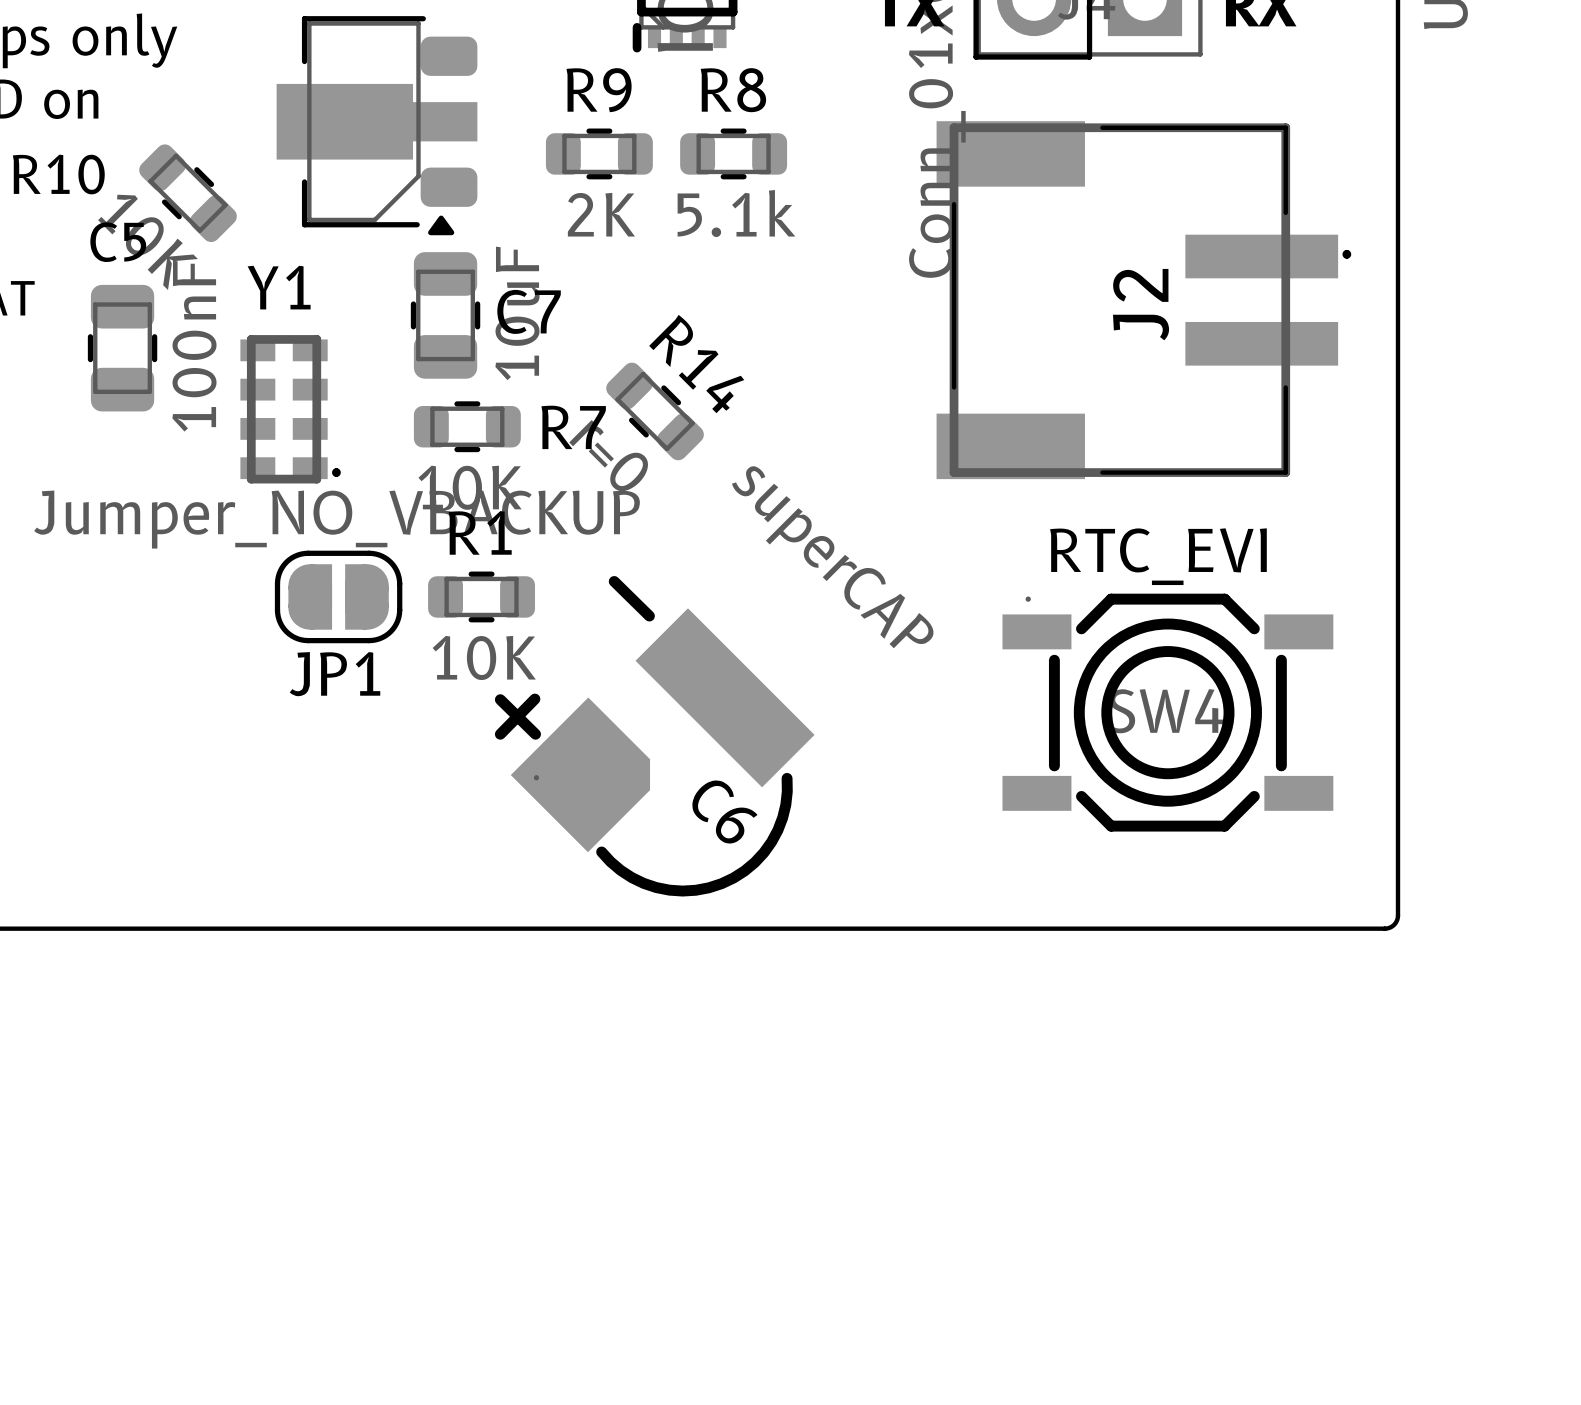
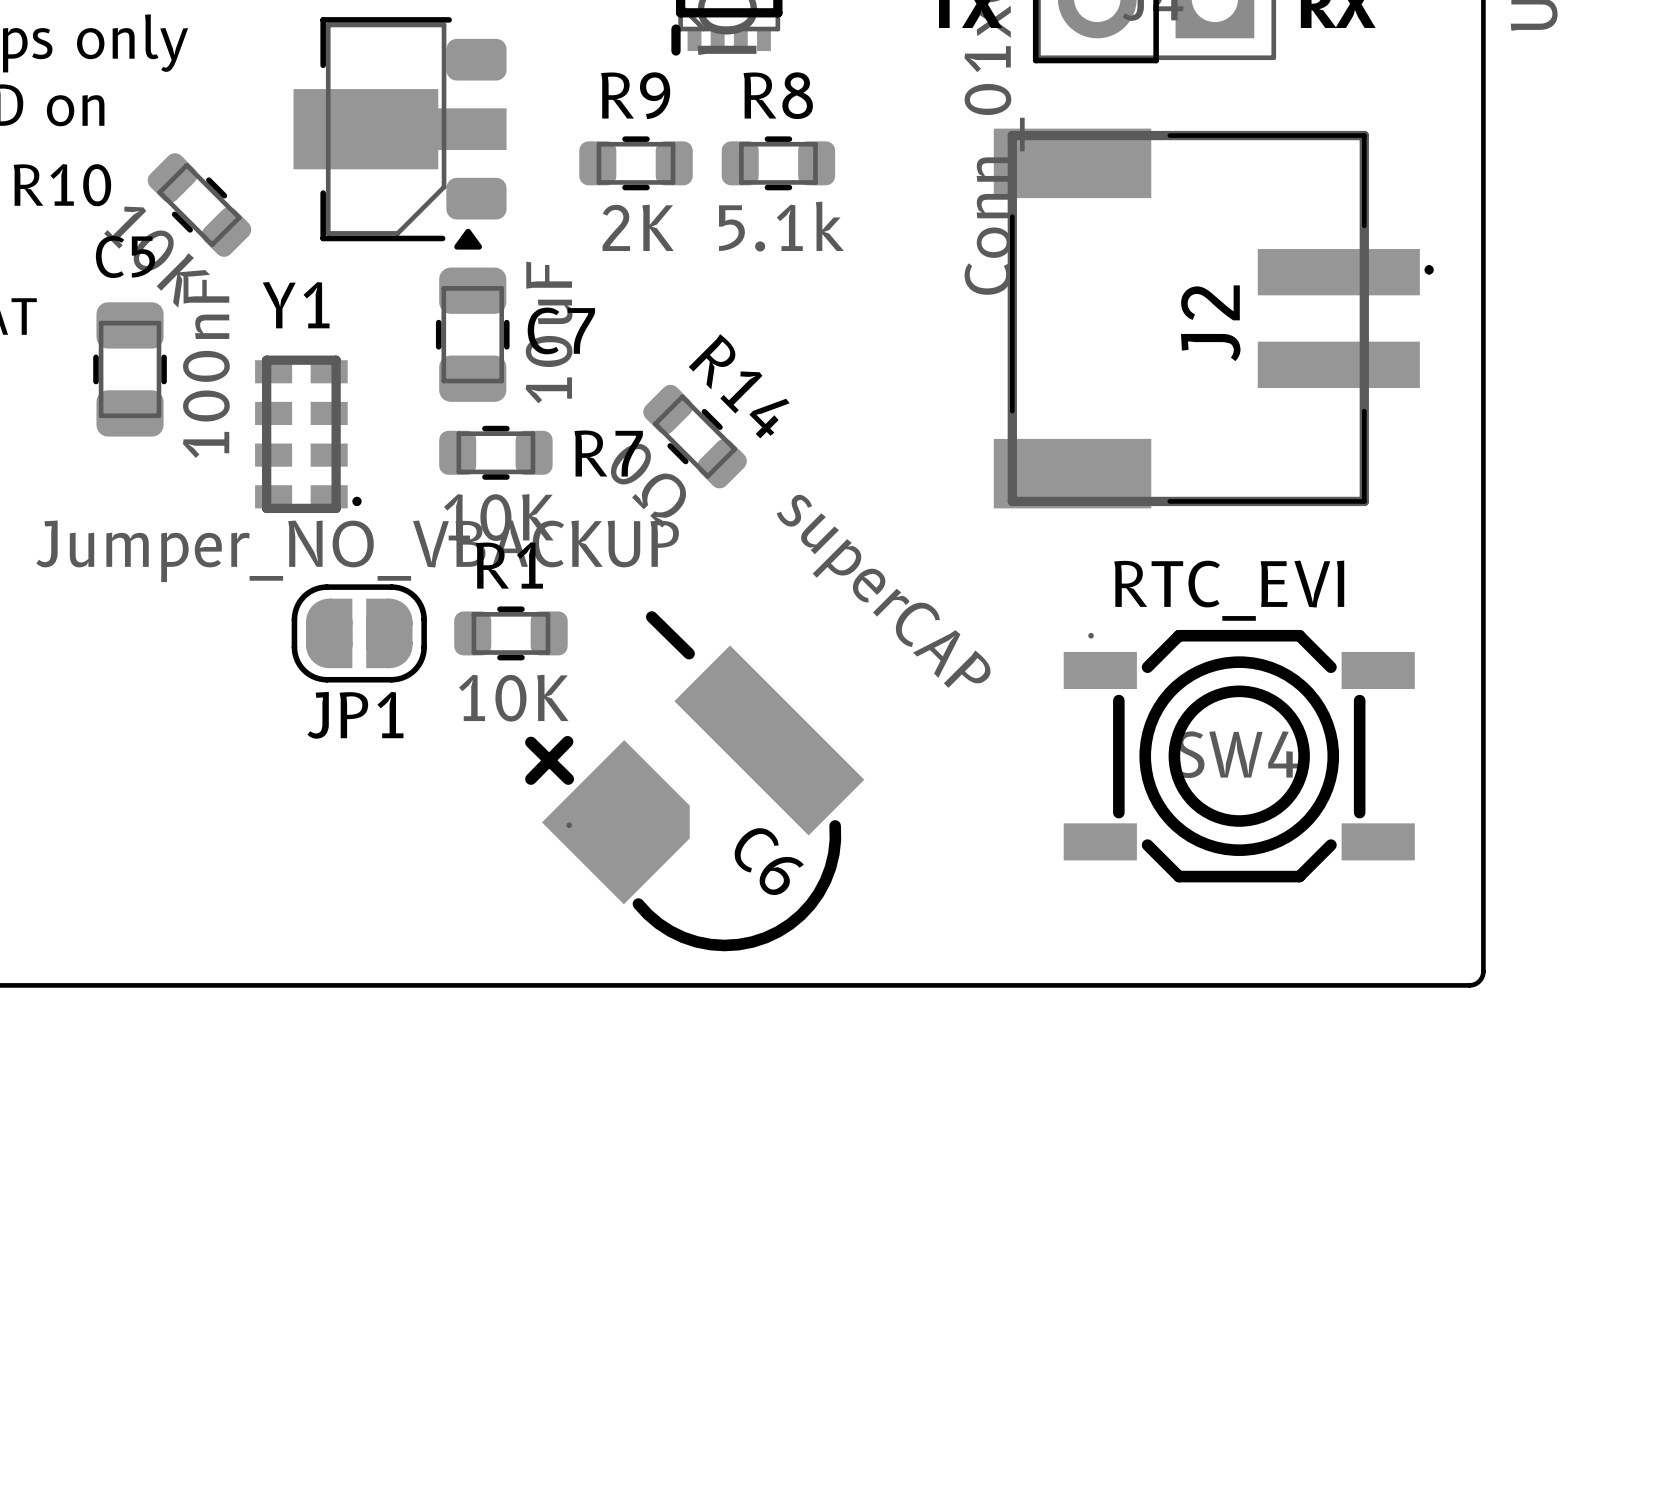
R14 value: r=0 (608, 455) -> 0Ω (648, 485)

